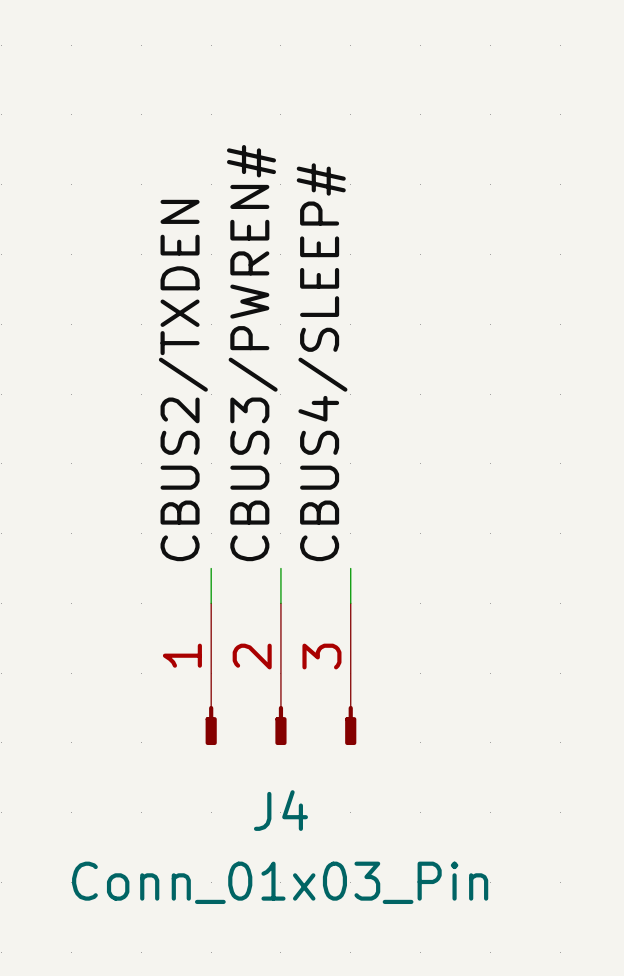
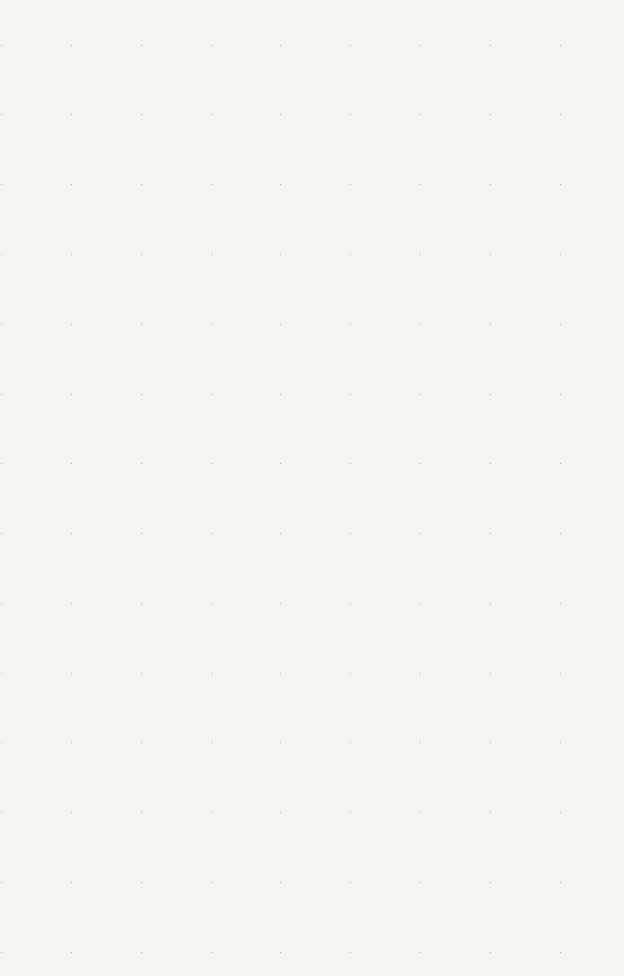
label: CBUS3/PWREN# (252, 353) -> none
label: CBUS4/SLEEP# (322, 362) -> none
label: CBUS2/TXDEN (183, 380) -> none
wire: (211, 568) (211, 603) -> none
wire: (280, 568) (280, 603) -> none
wire: (350, 568) (350, 603) -> none
J4: Conn_01x03_Pin (280, 674) -> none

